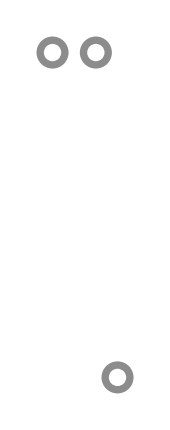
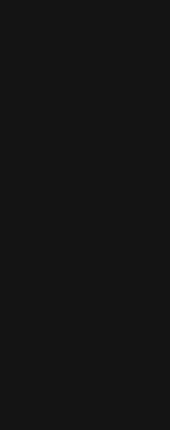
part: (74, 52) -> none
part: (117, 377) -> none

